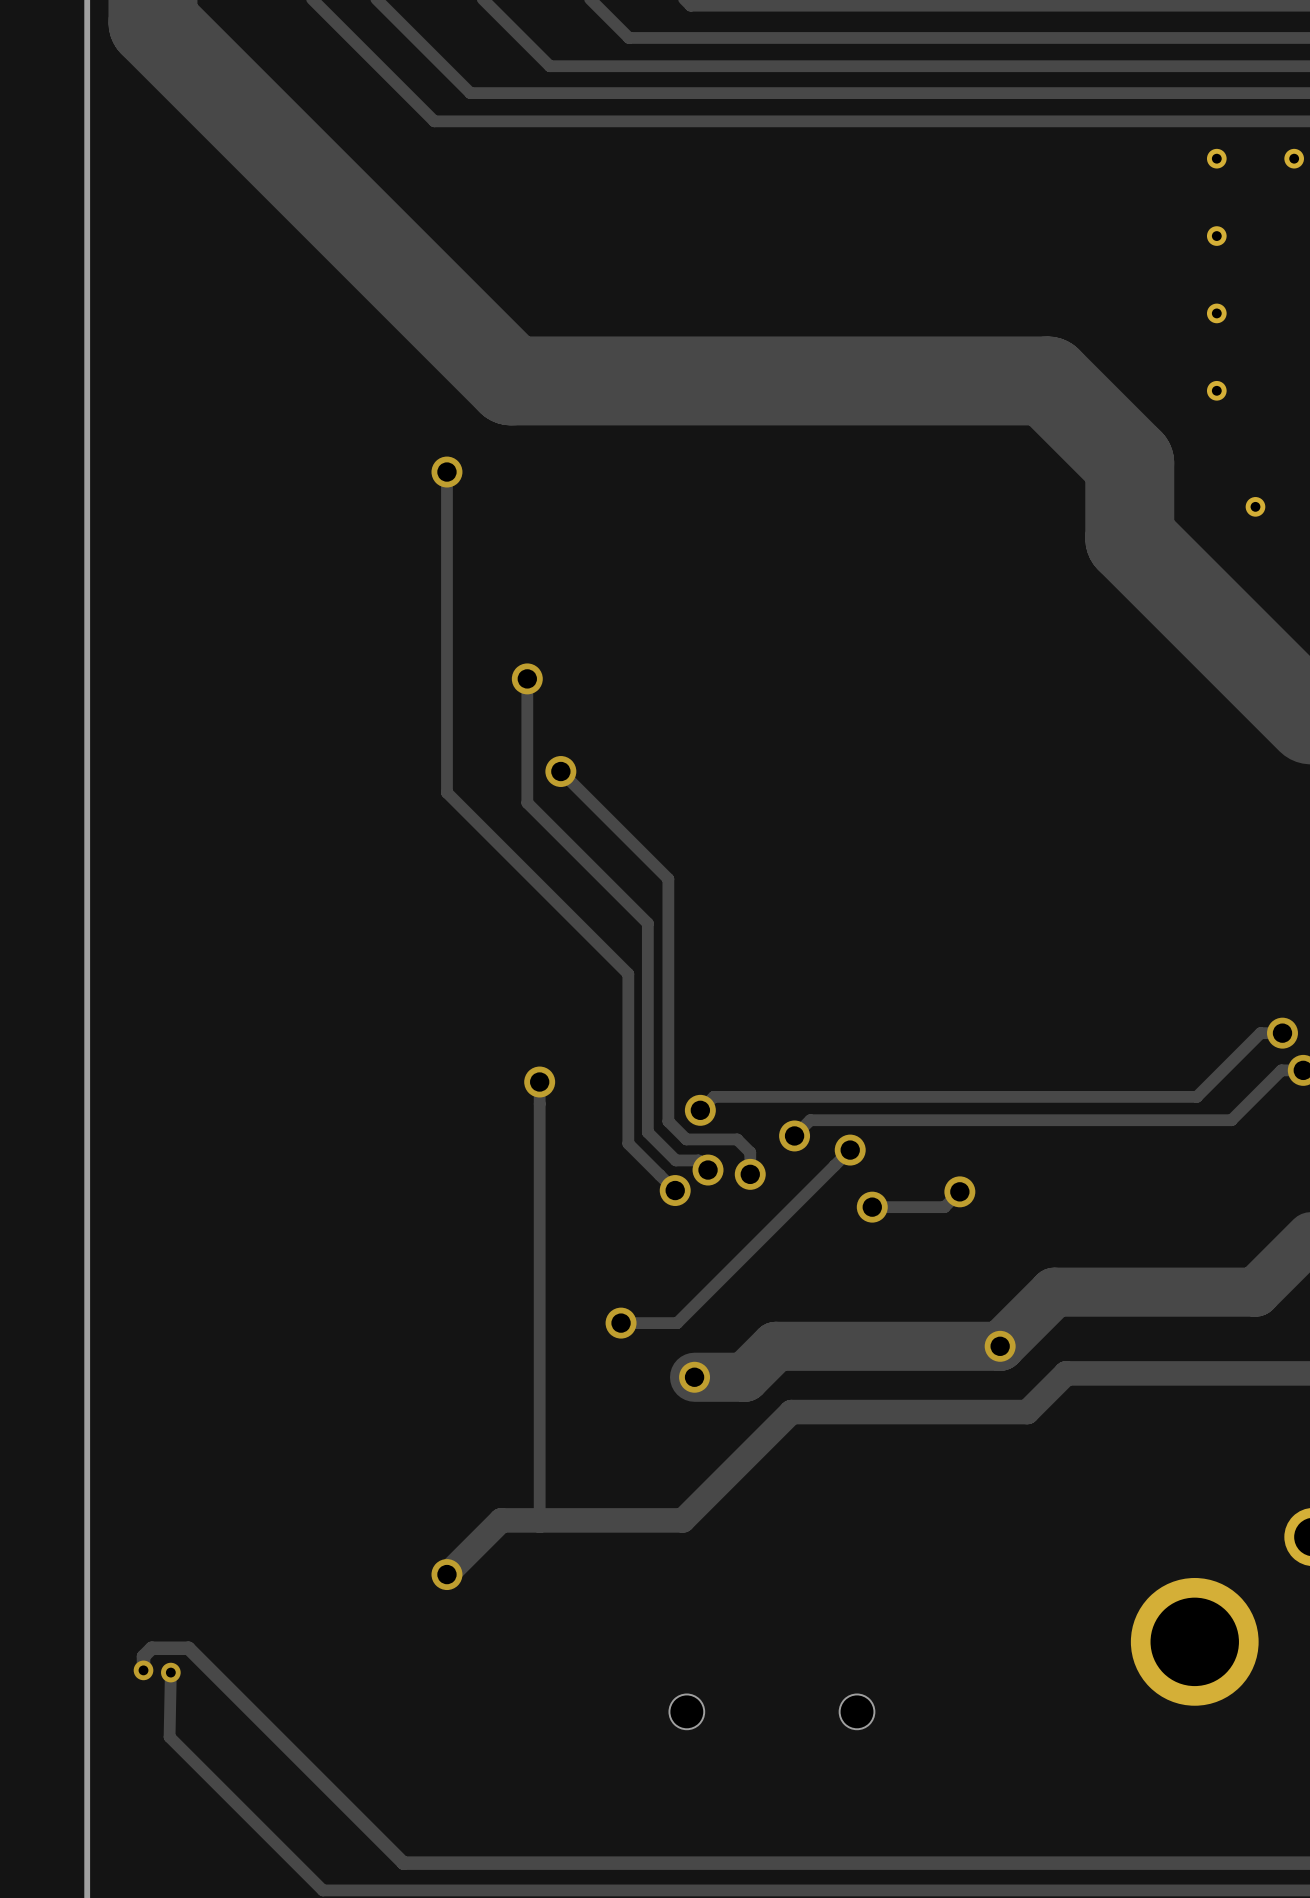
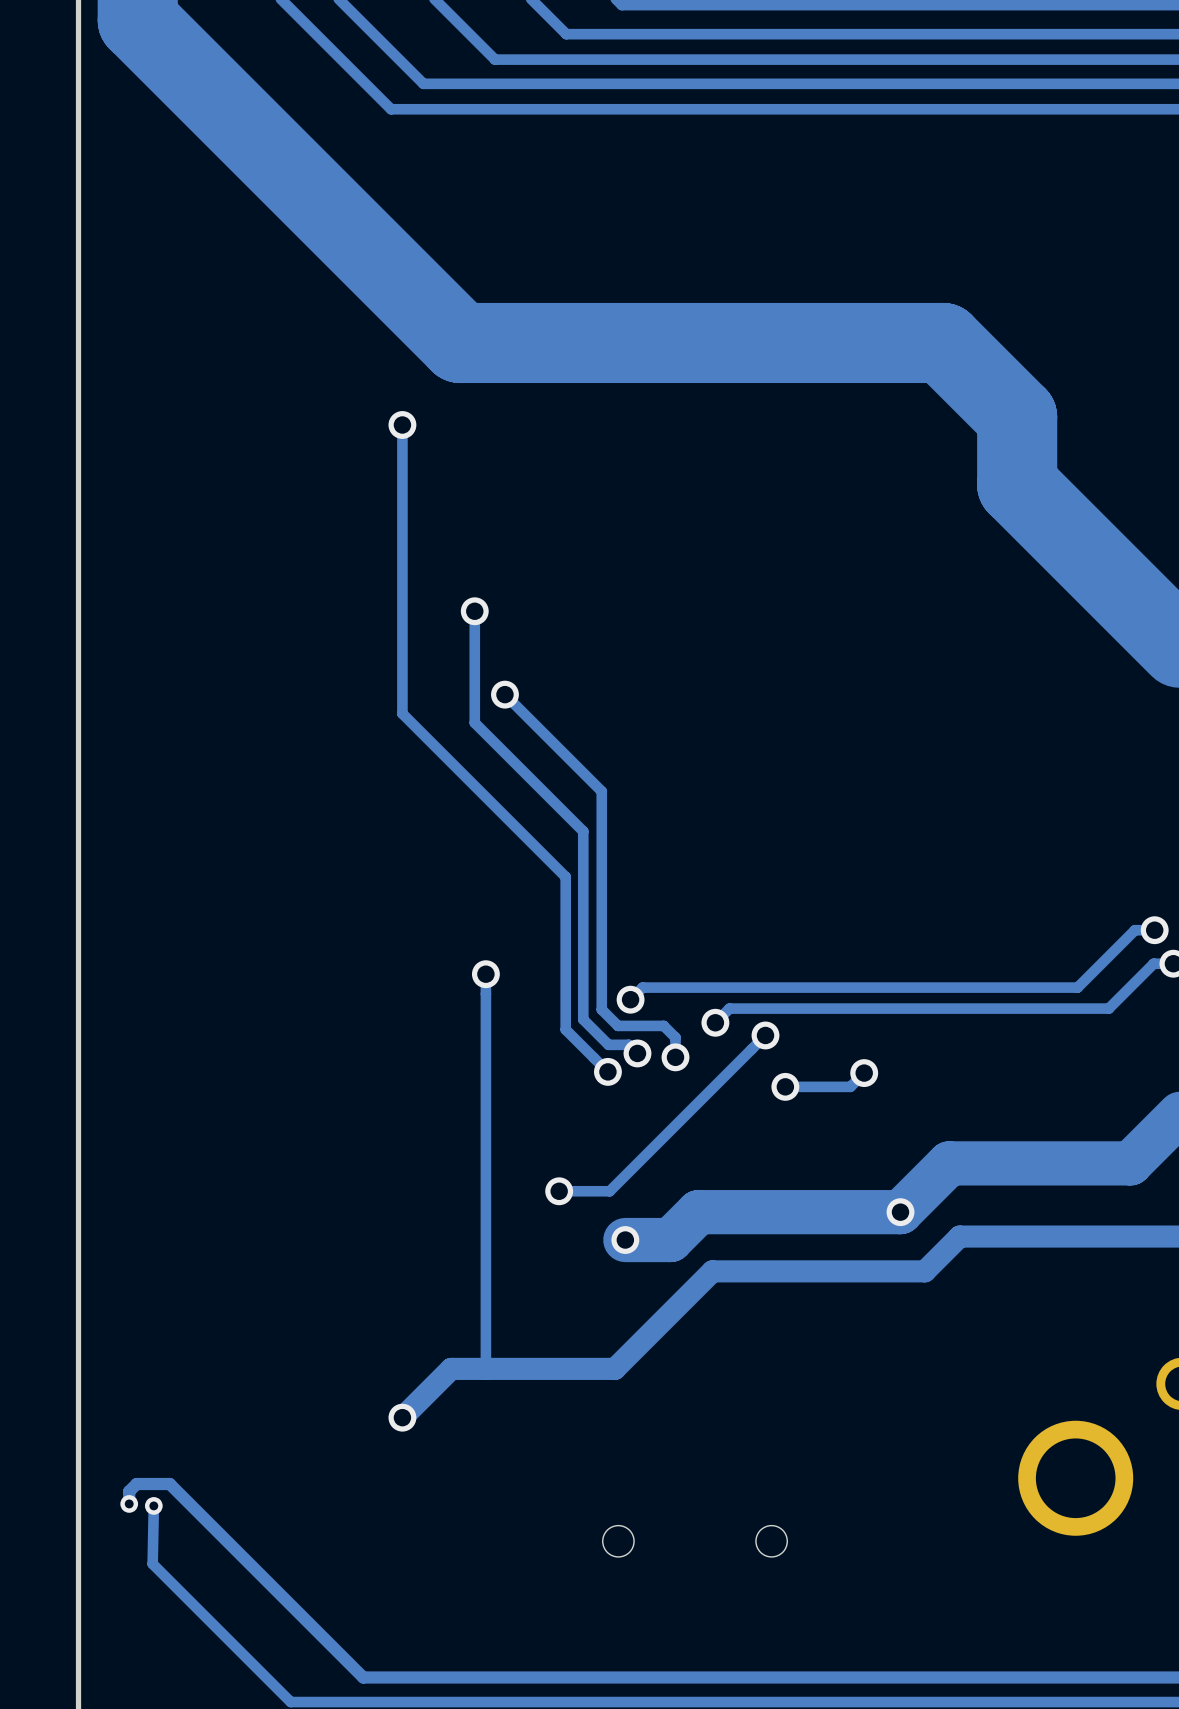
part: (1216, 158) -> none
part: (1294, 158) -> none
part: (1216, 236) -> none
part: (1216, 313) -> none
part: (1216, 390) -> none
part: (1255, 506) -> none

